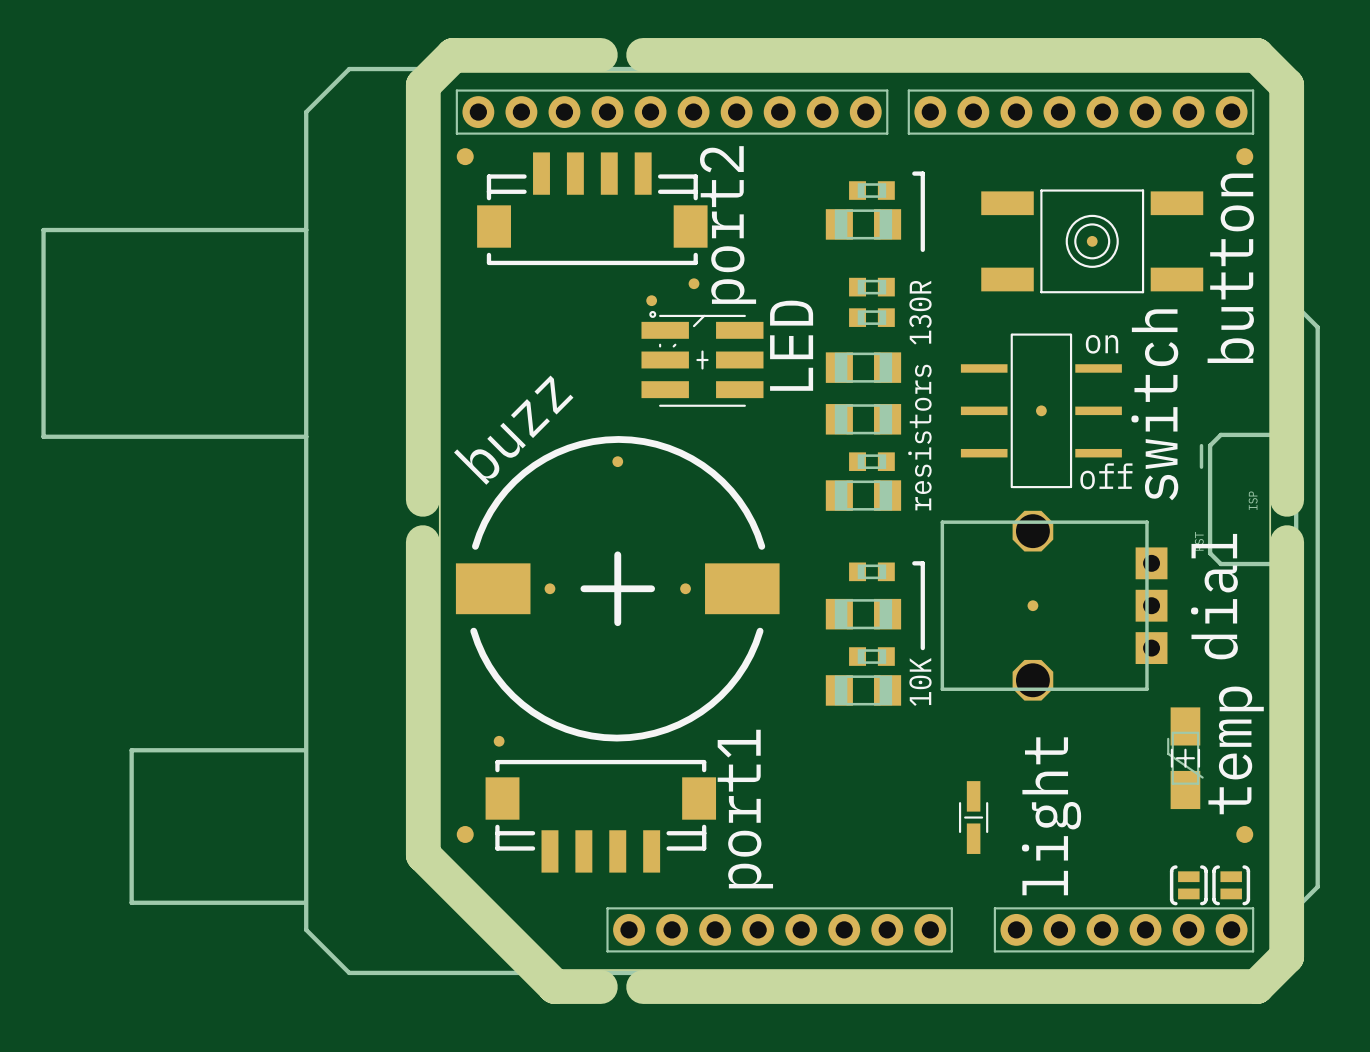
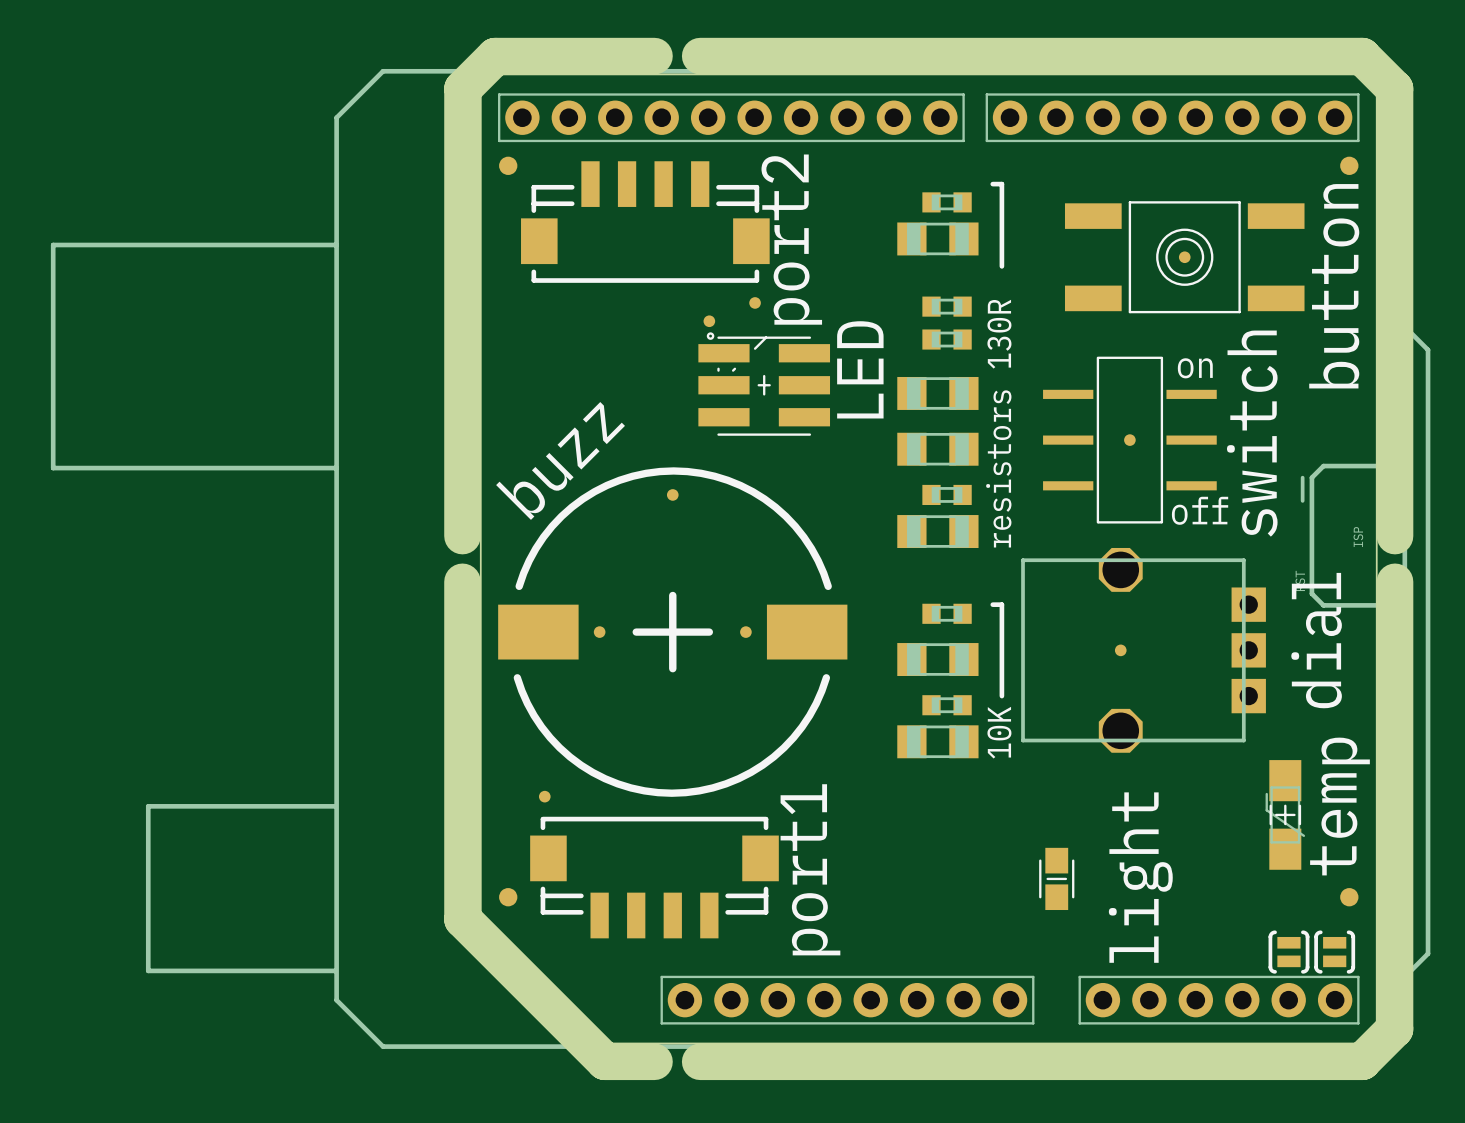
part footprint: [958, 781, 989, 854] -> [1039, 847, 1075, 911]

